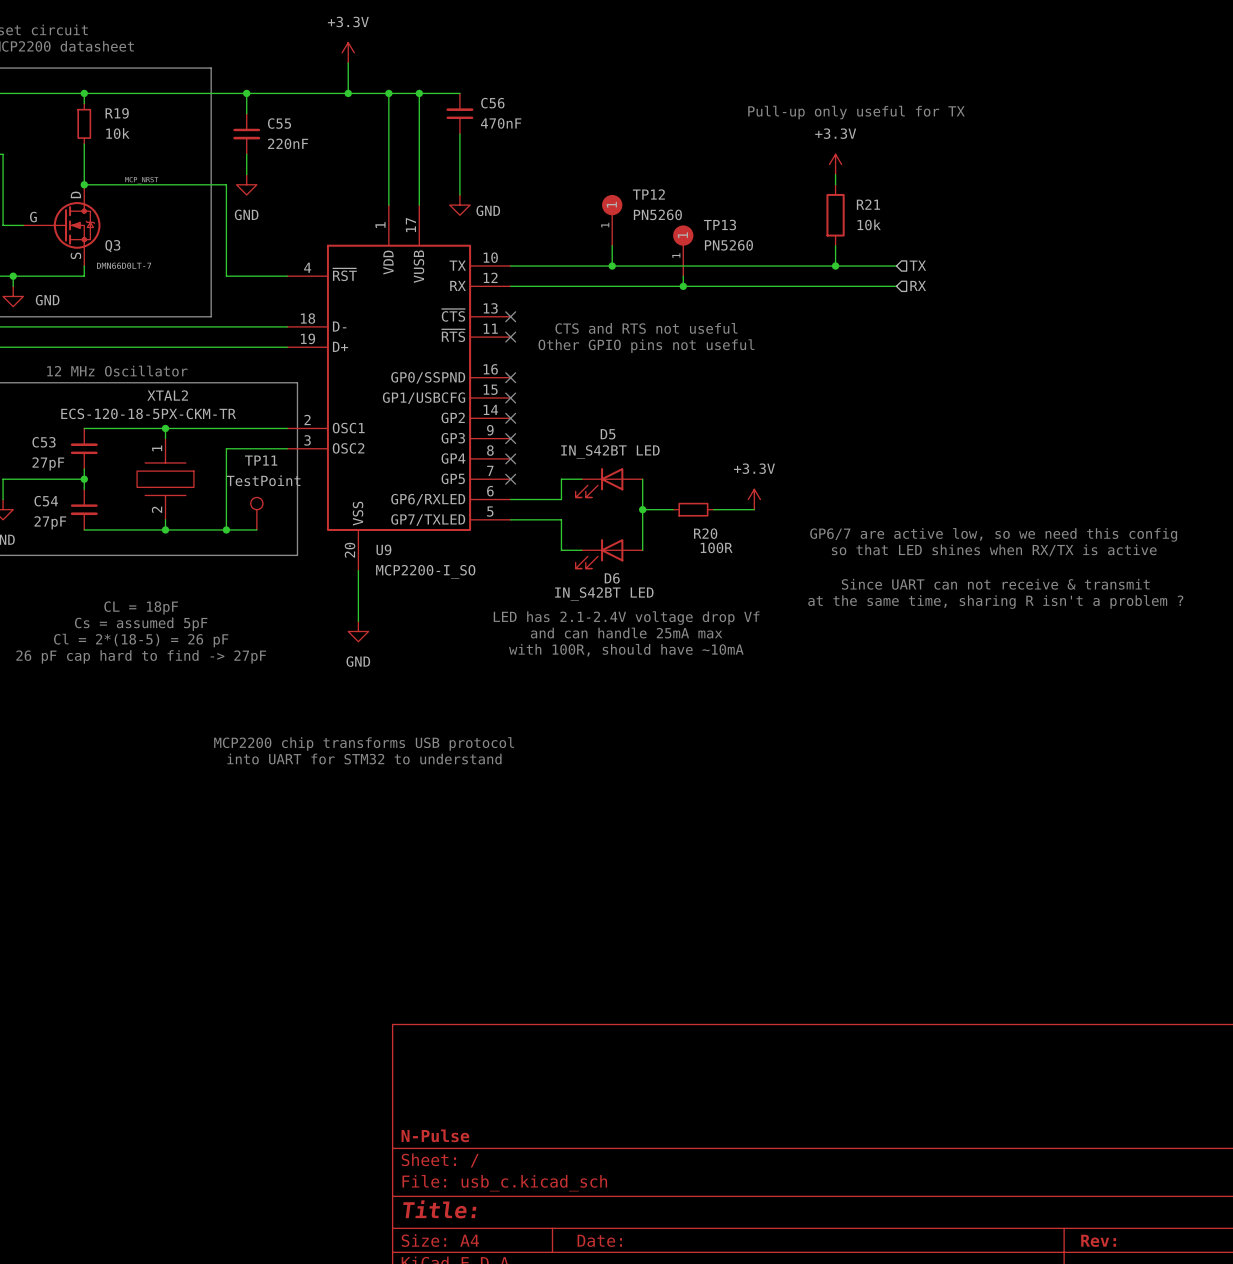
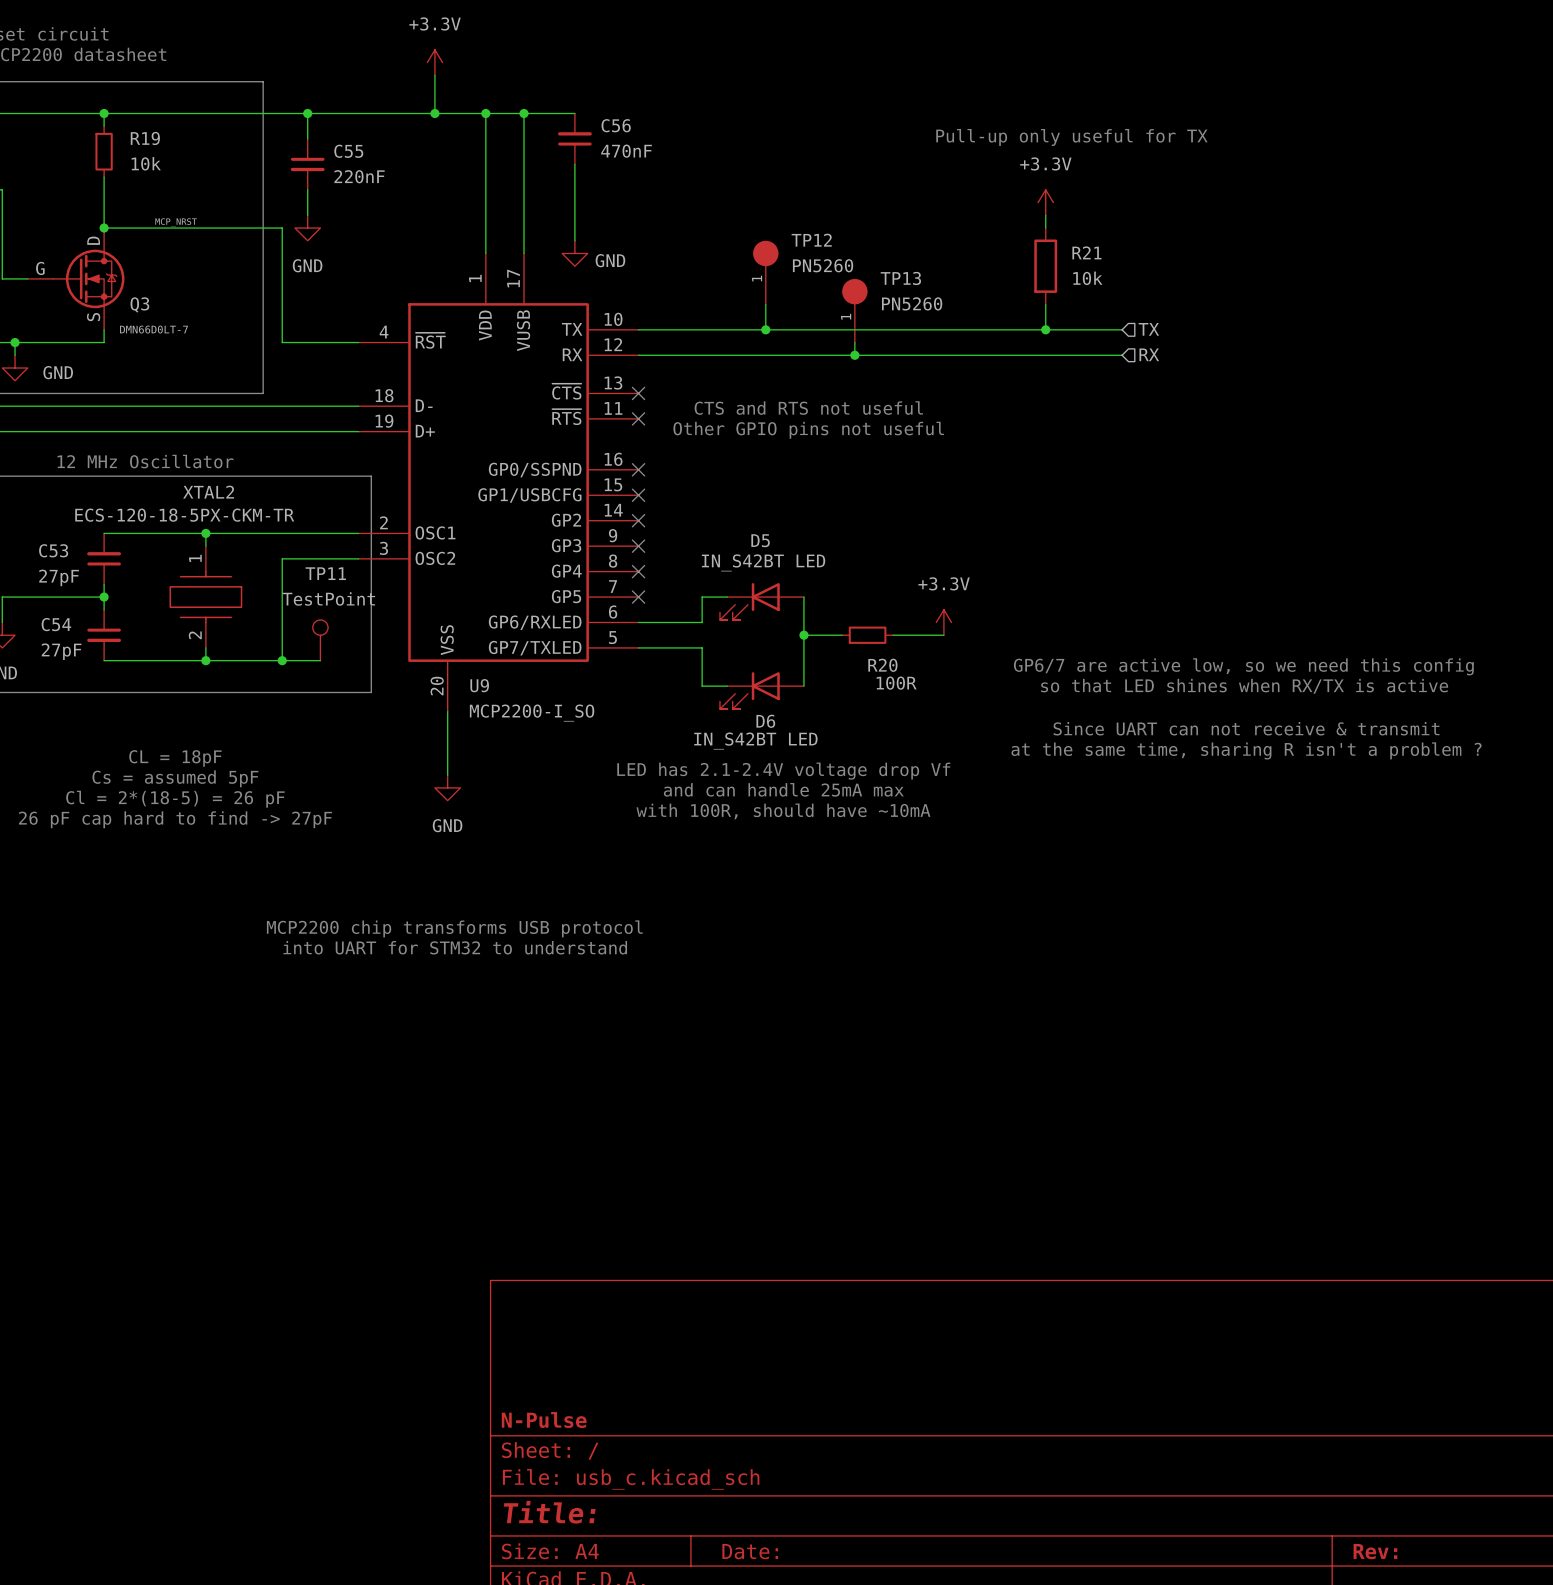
TP12 text: 1 (611, 204) -> none
TP13 text: 1 (682, 235) -> none

